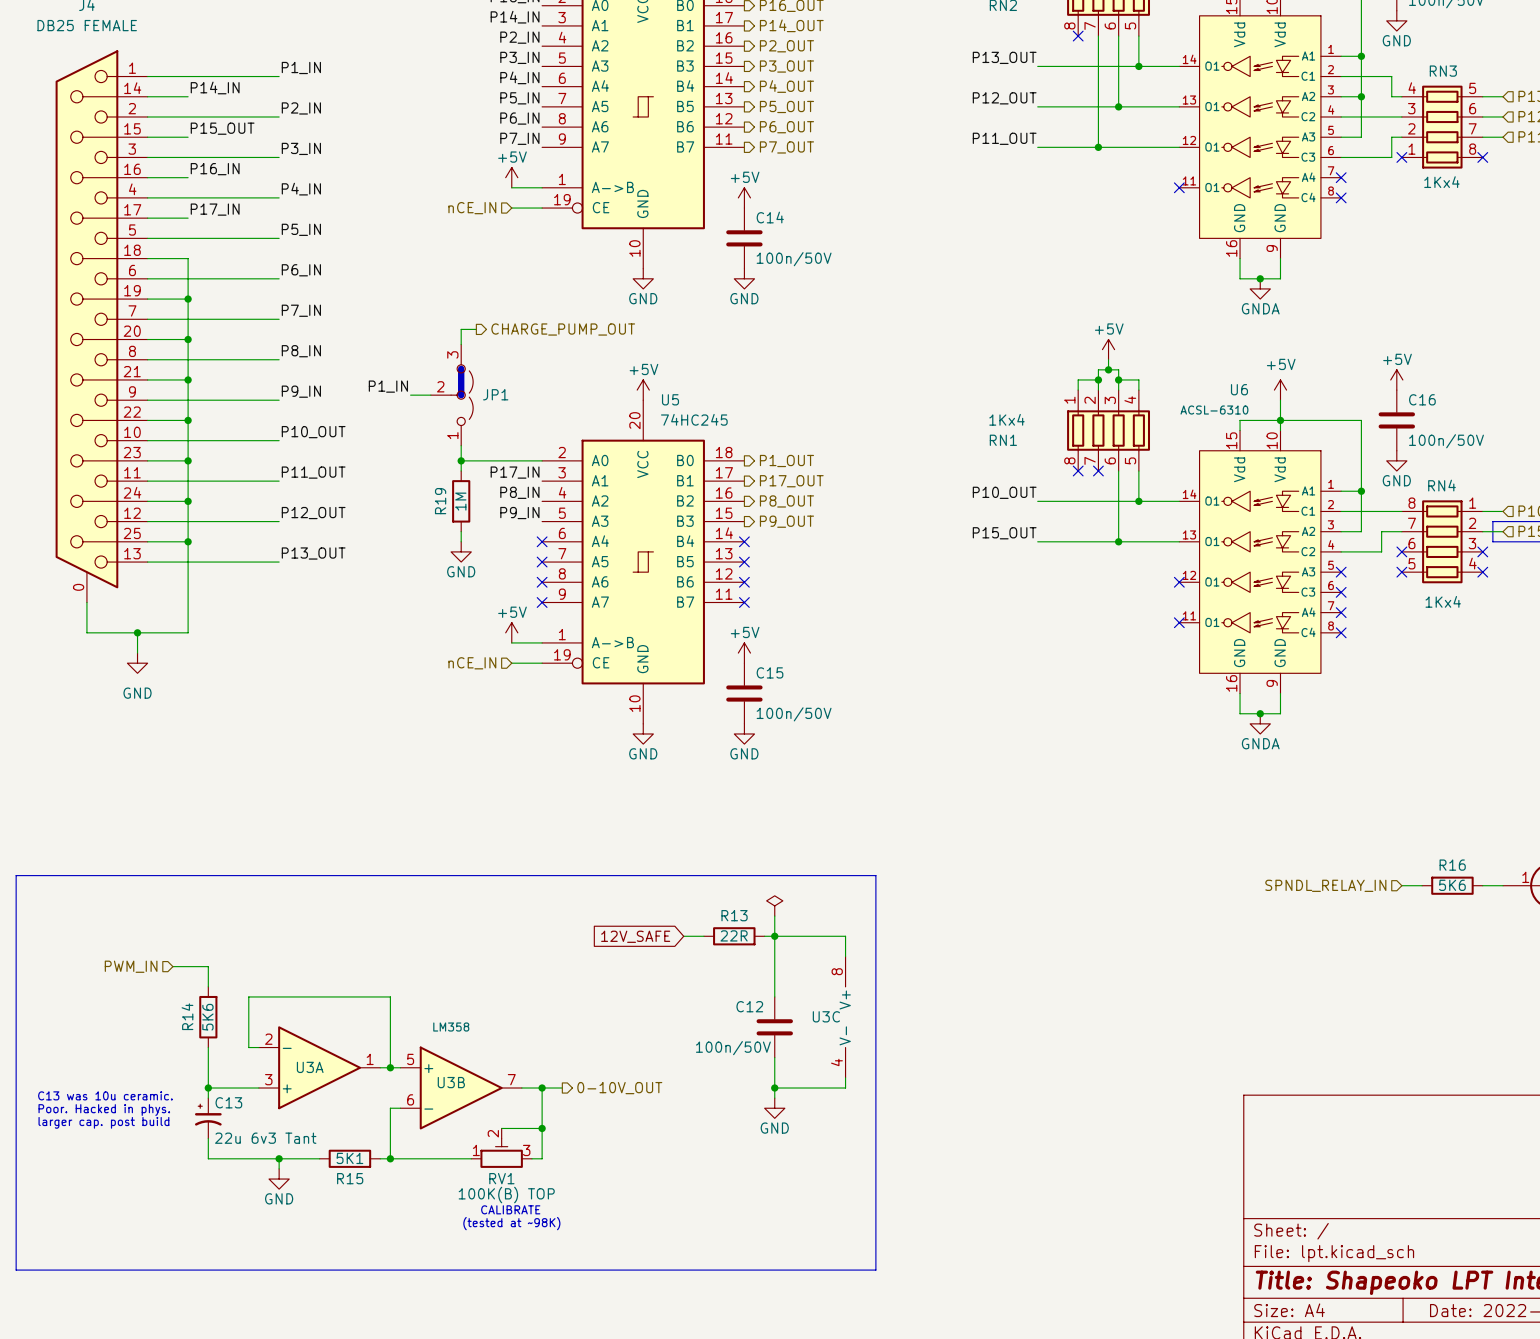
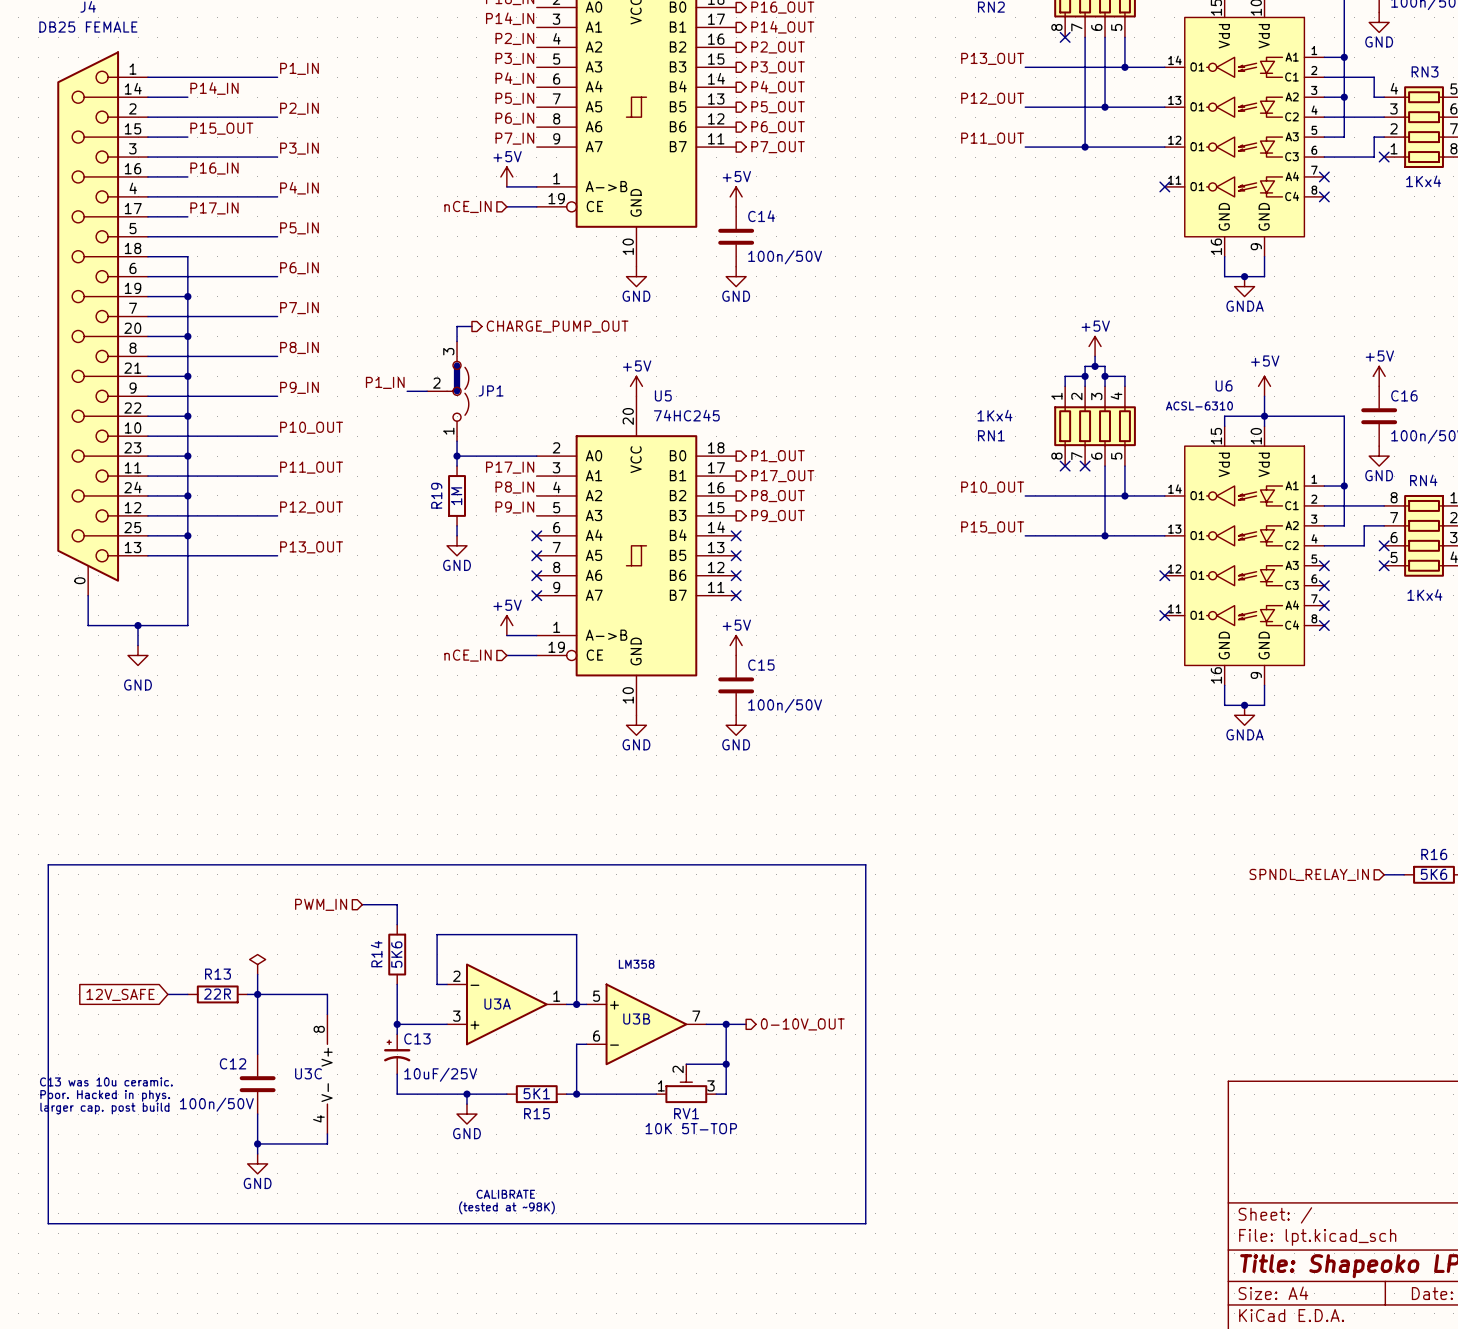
line: (46, 875) (16, 875) (16, 1270) (875, 1270) (875, 1239) -> (48, 864) (48, 1223) (865, 1223)
power symbol: (774, 905) -> none
wire: (774, 916) (774, 996) -> none
global label: 12V_SAFE (635, 936) -> none
wire: (683, 936) (703, 936) -> none
R13 position: (734, 936) -> (217, 994)
wire: (764, 936) (845, 936) (845, 956) -> none
junction: (774, 936) -> none
hierarchical label position: PWM_IN (131, 966) -> PWM_IN (321, 904)
wire: (172, 966) (208, 966) (208, 986) -> (362, 904) (397, 904) (397, 924)
power symbol: none -> (257, 964)
wire: none -> (257, 974) (257, 1054)
global label: none -> 12V_SAFE (120, 994)
wire: none -> (167, 994) (187, 994)
wire: none -> (247, 994) (327, 994) (327, 1014)
junction: none -> (257, 994)
R14 position: (208, 1017) -> (397, 954)
junction: none -> (576, 1004)
U3C position: (845, 1017) -> (327, 1074)
C12 position: (774, 1027) -> (257, 1084)
junction: none -> (726, 1024)
wire: (208, 1047) (208, 1098) -> (397, 984) (397, 1034)
wire: (258, 1047) (248, 1047) (248, 996) (390, 996) (390, 1067) -> (447, 984) (437, 984) (437, 934) (576, 934) (576, 1004)
wire: (774, 1057) (774, 1098) -> none
U3A position: (319, 1067) -> (506, 1004)
wire: (380, 1067) (400, 1067) -> (566, 1004) (586, 1004)
junction position: (390, 1067) -> (397, 1024)
junction: none -> (726, 1064)
wire: (845, 1077) (845, 1088) (774, 1088) -> none
wire: (208, 1088) (258, 1088) -> (397, 1024) (447, 1024)
junction: (208, 1088) -> none
wire: none -> (397, 1074) (397, 1094) (506, 1094)
U3B position: (461, 1088) -> (646, 1024)
wire: (521, 1088) (562, 1088) -> (706, 1024) (746, 1024)
wire: (542, 1088) (542, 1158) (532, 1158) -> (726, 1024) (726, 1094) (716, 1094)
junction: (542, 1088) -> none
hierarchical label position: 0-10V_OUT (619, 1088) -> 0-10V_OUT (802, 1024)
junction: (774, 1088) -> none
wire: (400, 1108) (390, 1108) (390, 1158) -> (586, 1044) (576, 1044) (576, 1094)
junction: none -> (466, 1094)
junction: none -> (576, 1094)
power symbol: GND (774, 1108) -> none
C13 position: (208, 1118) -> (397, 1054)
wire: none -> (257, 1114) (257, 1153)
power symbol: none -> GND (466, 1114)
wire: (501, 1128) (542, 1128) -> (686, 1064) (726, 1064)
junction: (542, 1128) -> none
wire: (208, 1138) (208, 1158) (258, 1158) -> none
C13 value: 22u 6v3 Tant (265, 1138) -> 10uF/25V (440, 1074)
RV1 position: (501, 1148) -> (686, 1083)
wire: (279, 1158) (279, 1168) -> (466, 1094) (466, 1104)
junction position: (279, 1158) -> (257, 1143)
R15 position: (349, 1158) -> (536, 1094)
wire: (380, 1158) (471, 1158) -> (566, 1094) (656, 1094)
junction: (390, 1158) -> none
power symbol position: GND (279, 1179) -> GND (257, 1163)
RV1 value: 100K(B) TOP (506, 1195) -> 10K 5T-TOP (691, 1128)

